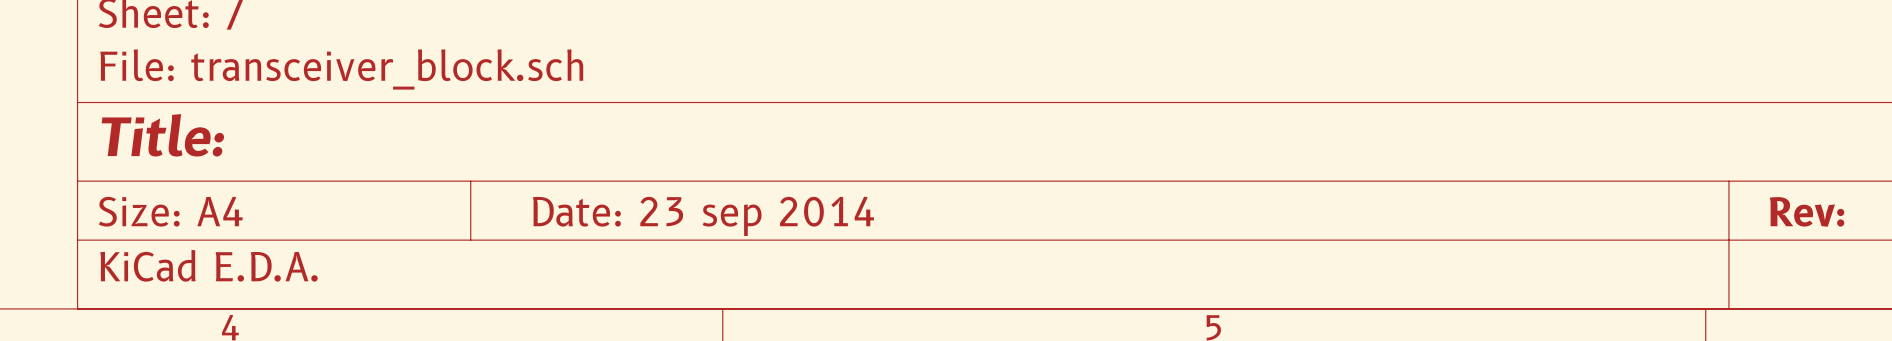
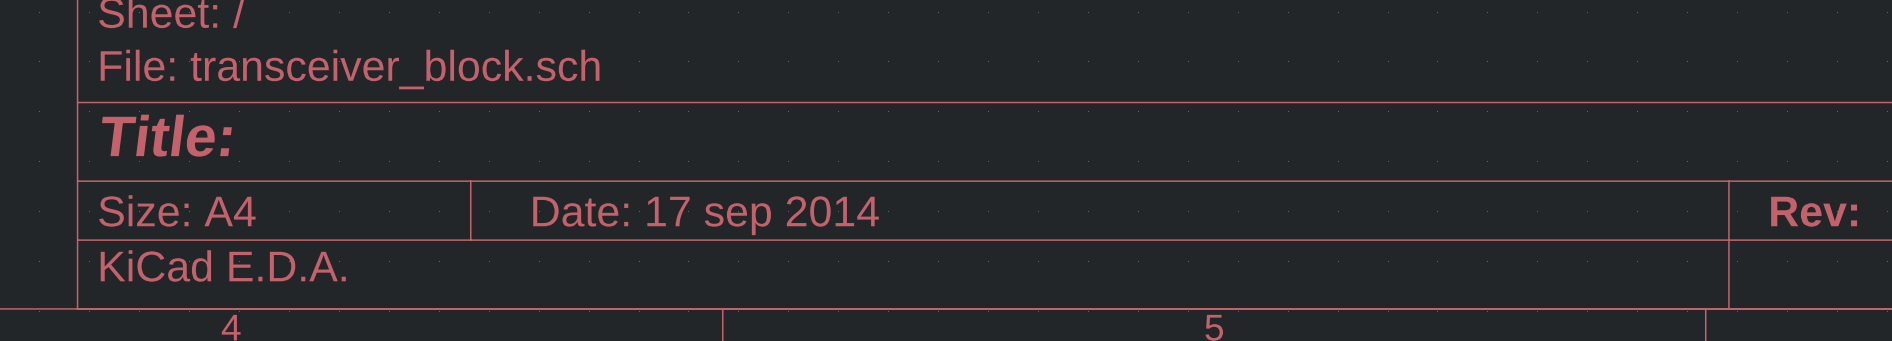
title block: Date: 23 sep 2014 (703, 216) -> Date: 17 sep 2014 (706, 215)

